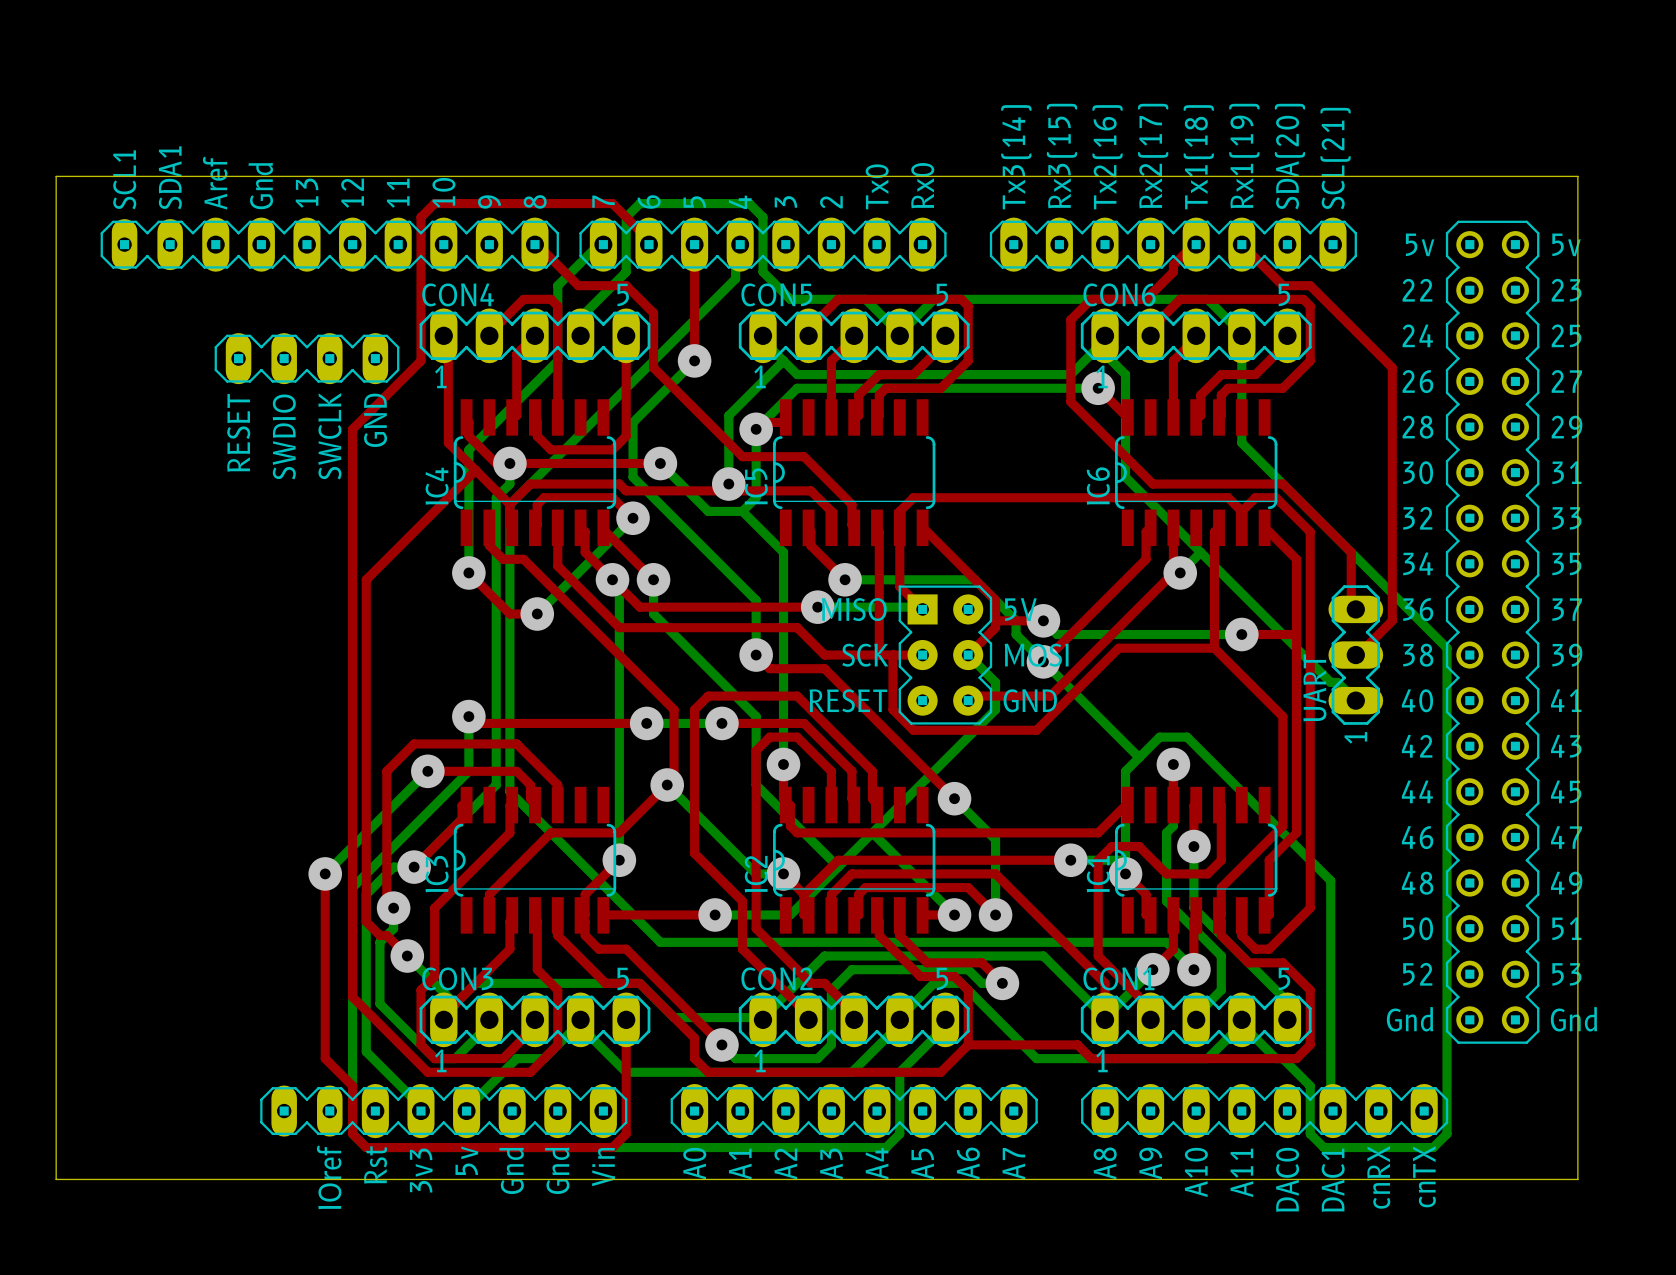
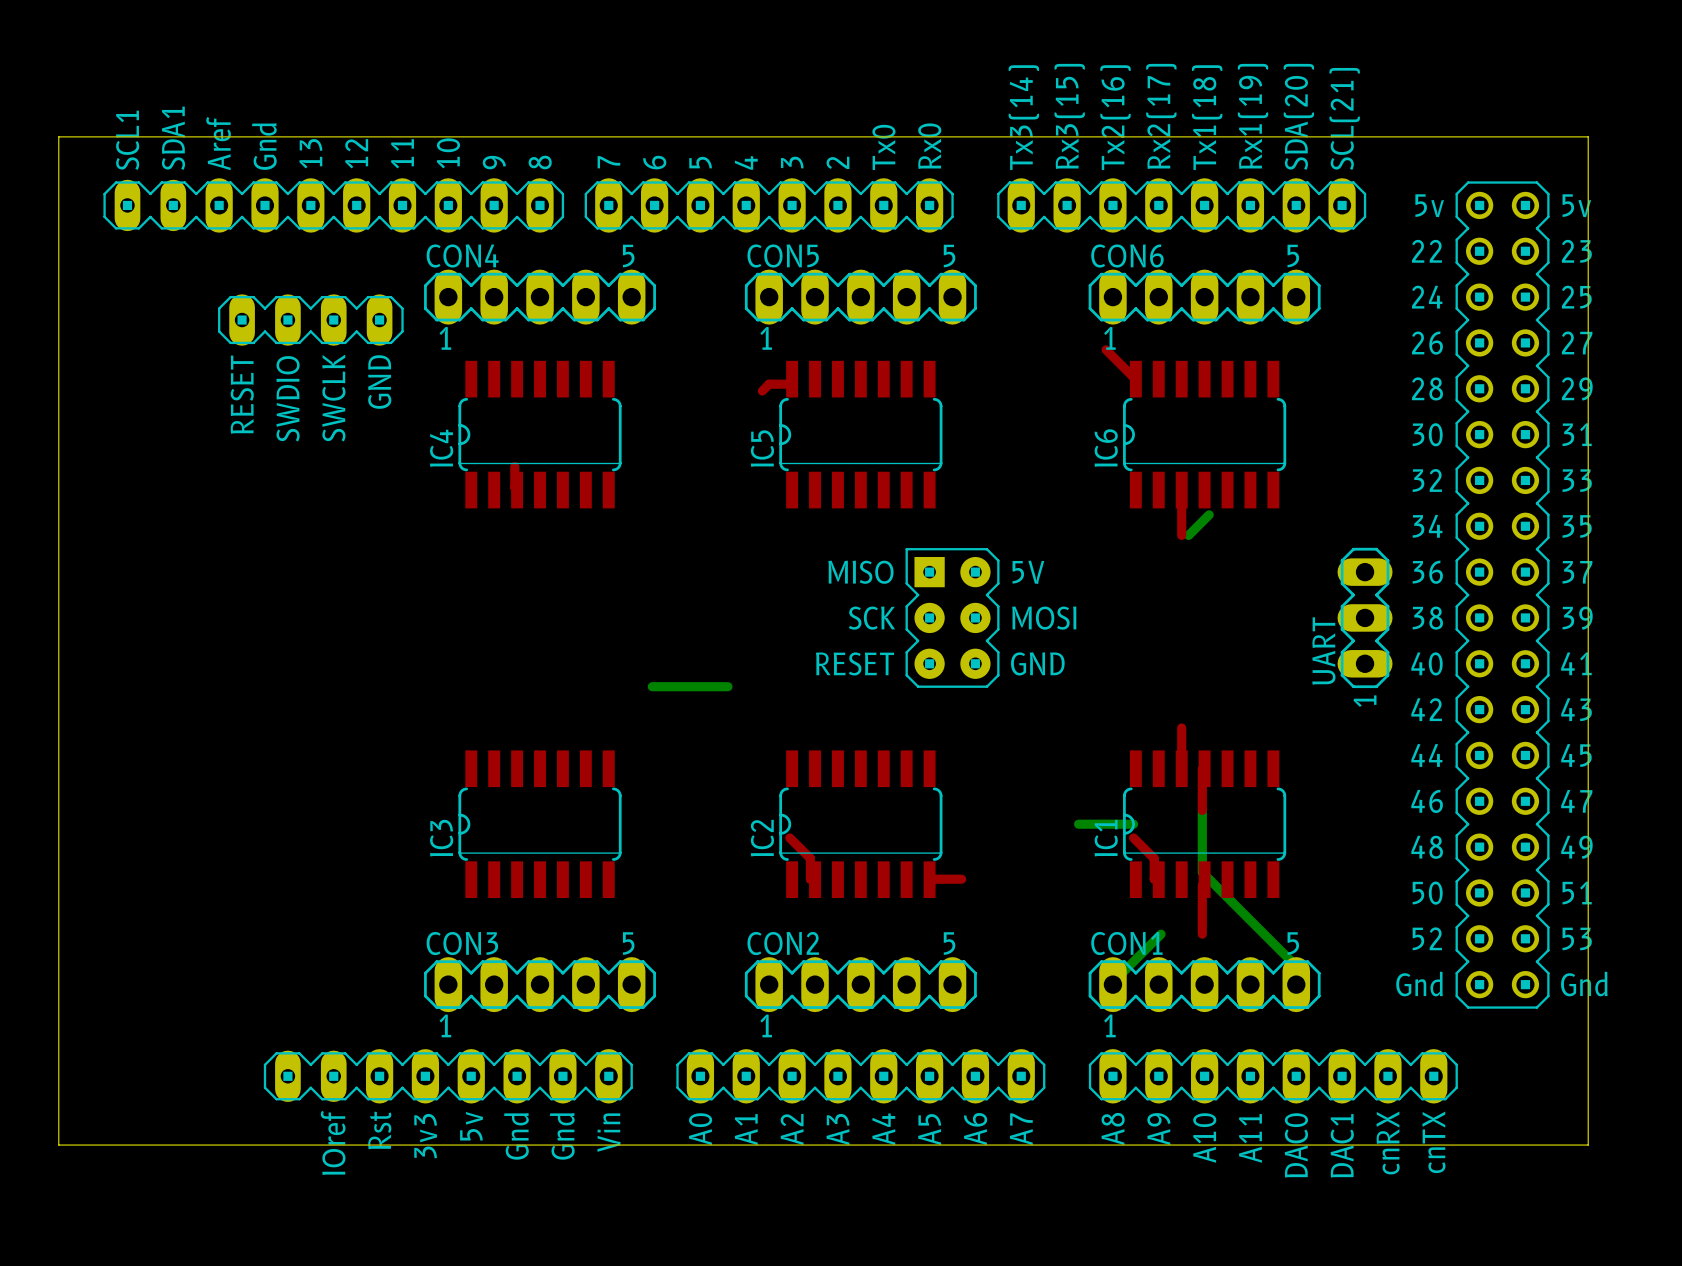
top track: (534, 244) (537, 244) (578, 285) (626, 285) (653, 313) (653, 367) (742, 456) (804, 456) (851, 504) (851, 525) (854, 527) -> none
bottom track: (603, 244) (598, 244) (557, 285) (557, 360) (468, 449) (468, 572) -> none
top track: (648, 244) (653, 244) (612, 203) (434, 203) (420, 217) (420, 360) (352, 429) (352, 997) (427, 1072) (530, 1072) (557, 1044) (557, 990) (537, 969) (537, 921) (534, 915) -> none
top track: (694, 244) (694, 360) -> none
bottom track: (740, 244) (735, 244) (735, 278) (509, 504) (509, 791) (660, 942) (1166, 942) (1193, 969) -> none
top track: (1196, 244) (1193, 244) (1173, 265) (1173, 271) (1146, 299) (1091, 299) (1070, 319) (1070, 401) (1152, 484) (1282, 484) (1351, 552) (1351, 607) (1355, 609) -> none
top track: (1241, 244) (1282, 285) (1310, 285) (1392, 367) (1392, 620) (1358, 655) (1355, 655) -> none
bottom track: (899, 333) (865, 299) (790, 299) (762, 271) (762, 217) (749, 203) (639, 203) (626, 217) (626, 271) (585, 313) (585, 333) (580, 335) -> none
bottom track: (899, 333) (934, 299) (1207, 299) (1241, 333) (1241, 442) (1447, 648) (1447, 1133) (1433, 1147) (1323, 1147) (1310, 1133) (1310, 1085) (1282, 1058) (1276, 1058) (1241, 1024) -> none
top track: (443, 335) (448, 340) (448, 442) (509, 504) (530, 484) (619, 484) (626, 490) (810, 490) (831, 511) (831, 527) -> none
top track: (489, 335) (489, 333) (523, 299) (550, 299) (557, 306) (557, 417) -> none
top track: (534, 335) (516, 354) (516, 415) (512, 417) -> none
top track: (626, 335) (626, 436) (612, 449) (550, 449) (537, 436) (537, 422) (534, 417) -> none
bottom track: (762, 335) (762, 340) (797, 374) (1070, 374) (1105, 340) (1105, 335) (1098, 347) (1125, 374) (1125, 477) (1330, 682) (1337, 682) (1355, 700) -> none
top track: (808, 335) (804, 333) (838, 299) (961, 299) (968, 306) (968, 360) (940, 388) (886, 388) (879, 395) (879, 415) (876, 417) -> none
top track: (854, 335) (831, 360) (831, 417) -> none
top track: (945, 335) (947, 340) (913, 374) (879, 374) (858, 395) (858, 415) (854, 417) -> none
top track: (1150, 335) (1146, 333) (1180, 299) (1303, 299) (1310, 306) (1310, 360) (1282, 388) (1228, 388) (1221, 395) (1221, 415) (1219, 417) -> none
top track: (1196, 335) (1173, 360) (1173, 417) -> none
top track: (1287, 335) (1289, 340) (1255, 374) (1221, 374) (1200, 395) (1200, 415) (1196, 417) -> none
bottom track: (694, 360) (633, 422) (633, 477) (756, 600) (756, 655) -> none
via: (694, 360) -> none
bottom track: (783, 360) (728, 415) (728, 484) -> none
bottom track: (1098, 388) (797, 388) (756, 429) (756, 497) (742, 511) -> none
via: (1098, 388) -> none
top track: (466, 417) (468, 422) (468, 436) (496, 463) (660, 463) -> none
via: (756, 429) -> none
bottom track: (509, 463) (509, 484) (496, 497) (496, 785) (414, 867) (393, 867) (366, 894) (366, 1051) (420, 1106) (420, 1111) -> none
via: (509, 463) -> none
bottom track: (660, 463) (708, 511) (742, 511) -> none
via: (660, 463) -> none
top track: (475, 470) (366, 579) (366, 921) (379, 935) (386, 935) (407, 956) -> none
via: (728, 484) -> none
bottom track: (742, 511) (783, 552) (783, 764) -> none
top track: (1241, 511) (1255, 497) (1276, 497) (1310, 531) (1310, 908) (1269, 949) (1255, 949) (1241, 935) (1241, 915) -> none
top track: (1241, 511) (1228, 497) (913, 497) (899, 511) (899, 586) (922, 609) -> none
top track: (633, 518) (612, 497) (544, 497) (537, 504) (537, 525) (534, 527) -> none
bottom track: (633, 518) (537, 614) -> none
via: (633, 518) -> none
top track: (489, 527) (489, 545) (503, 559) (523, 559) (674, 709) (674, 778) (619, 832) (550, 832) (489, 894) (489, 915) -> none
top track: (557, 527) (557, 566) (619, 627) (797, 627) (824, 655) (922, 655) -> none
top track: (580, 527) (585, 531) (585, 552) (639, 607) (817, 607) -> none
top track: (603, 527) (653, 579) -> none
top track: (808, 527) (810, 531) (810, 545) (845, 579) -> none
top track: (876, 527) (879, 531) (879, 655) -> none
top track: (922, 527) (995, 600) (995, 627) (968, 655) -> none
top track: (1150, 527) (1146, 531) (1146, 559) (1043, 661) -> none
top track: (1219, 527) (1214, 531) (1214, 648) -> none
top track: (1264, 527) (1296, 559) (1296, 832) (1269, 860) (1269, 914) (1264, 915) -> none
top track: (468, 572) (509, 614) (537, 614) -> none
via: (468, 572) -> none
top track: (1180, 572) (1173, 572) (1050, 696) (968, 696) (968, 700) -> none
via: (1180, 572) -> none
bottom track: (612, 579) (619, 586) (619, 860) -> none
via: (612, 579) -> none
bottom track: (653, 579) (653, 614) (756, 716) (756, 785) (838, 867) -> none
via: (653, 579) -> none
bottom track: (845, 579) (975, 579) (1016, 620) (1016, 634) (1139, 757) -> none
via: (845, 579) -> none
bottom track: (817, 607) (920, 607) (922, 609) -> none
via: (817, 607) -> none
via: (537, 614) -> none
top track: (995, 620) (1043, 620) -> none
bottom track: (1043, 620) (1057, 634) (1241, 634) -> none
via: (1043, 620) -> none
top track: (1241, 634) (1296, 634) -> none
via: (1241, 634) -> none
top track: (1214, 648) (1282, 716) (1282, 826) (1221, 887) (1221, 914) (1219, 915) (1221, 921) (1221, 935) (1248, 962) (1282, 962) (1310, 990) (1310, 1044) (1296, 1058) (1091, 1058) (1077, 1044) (968, 1044) -> none
top track: (1214, 648) (1118, 648) (1036, 730) (913, 730) (892, 709) (892, 655) -> none
top track: (756, 655) (769, 668) (824, 668) (954, 798) -> none
via: (756, 655) -> none
bottom track: (968, 655) (995, 682) (995, 709) (790, 914) (715, 914) -> none
via: (1043, 661) -> none
top track: (468, 716) (475, 723) (646, 723) -> none
bottom track: (468, 716) (468, 771) (352, 887) (352, 1133) (366, 1147) (886, 1147) (899, 1133) (899, 1072) (947, 1024) (945, 1019) -> none
via: (468, 716) -> none
via: (646, 723) -> none
top track: (721, 723) (804, 723) (851, 771) (851, 798) (854, 805) -> none
via: (721, 723) -> none
top track: (783, 764) (783, 798) (785, 805) (790, 805) (790, 826) (797, 832) (1098, 832) (1127, 805) -> none
via: (783, 764) -> none
bottom track: (1173, 764) (1173, 826) (1166, 832) (1166, 901) (1221, 956) (1221, 990) (1193, 1017) (1196, 1019) -> none
via: (1173, 764) -> none
top track: (427, 771) (516, 771) (530, 785) (530, 798) (534, 805) -> none
bottom track: (427, 771) (325, 873) -> none
via: (427, 771) -> none
bottom track: (667, 785) (756, 873) (783, 873) -> none
via: (667, 785) -> none
bottom track: (954, 798) (995, 839) (995, 914) -> none
via: (954, 798) -> none
top track: (466, 805) (462, 805) (462, 819) (414, 867) -> none
top track: (512, 805) (509, 805) (509, 832) (434, 908) (434, 976) (420, 990) (420, 1044) (434, 1058) (503, 1058) (537, 1024) (534, 1019) -> none
top track: (557, 805) (557, 785) (516, 743) (414, 743) (386, 771) (386, 901) (393, 908) -> none
top track: (831, 805) (831, 771) (797, 737) (769, 737) (756, 750) (756, 928) (810, 983) (824, 983) (858, 1017) (854, 1019) -> none
top track: (876, 805) (872, 798) (872, 771) (797, 696) (708, 696) (694, 709) (694, 853) (742, 901) (742, 949) (810, 1017) (808, 1019) -> none
top track: (1219, 805) (1221, 805) (1221, 860) (1207, 873) (1166, 873) (1139, 846) (1111, 846) (1098, 860) (1098, 956) (1146, 1003) (1146, 1017) (1150, 1019) -> none
bottom track: (872, 832) (954, 914) -> none
via: (1193, 846) -> none
top track: (619, 860) (585, 894) (585, 914) (580, 915) (585, 921) (585, 935) (598, 949) (626, 949) (721, 1044) -> none
via: (619, 860) -> none
top track: (1070, 860) (838, 860) (804, 894) -> none
via: (1070, 860) -> none
via: (414, 867) -> none
top track: (325, 873) (325, 1058) (352, 1085) (352, 1133) (366, 1147) (612, 1147) (626, 1133) (626, 1019) -> none
via: (325, 873) -> none
via: (783, 873) -> none
bottom track: (1125, 873) (1125, 771) (1159, 737) (1187, 737) (1330, 880) (1330, 1106) (1333, 1111) -> none
via: (1125, 873) -> none
bottom track: (393, 908) (393, 928) (379, 942) (379, 1003) (434, 1058) (455, 1058) (489, 1024) (489, 1019) -> none
via: (393, 908) -> none
top track: (715, 914) (603, 915) -> none
via: (715, 914) -> none
via: (954, 914) -> none
top track: (995, 914) (968, 887) (865, 887) (858, 894) (858, 914) (854, 915) -> none
via: (995, 914) -> none
top track: (512, 915) (509, 921) (509, 949) (441, 1017) (443, 1019) -> none
top track: (557, 915) (557, 935) (605, 983) (639, 983) (694, 1038) (694, 1058) (708, 1072) (940, 1072) (968, 1044) -> none
top track: (831, 915) (831, 894) (851, 873) (995, 873) (1105, 983) (1105, 1019) -> none
top track: (876, 915) (879, 921) (879, 935) (920, 976) (954, 976) (968, 990) (968, 1044) -> none
top track: (899, 915) (899, 935) (927, 962) (981, 962) (1002, 983) -> none
top track: (1173, 915) (1173, 949) (1152, 969) -> none
bottom track: (407, 956) (455, 1003) (443, 1019) (441, 1017) (475, 983) (639, 983) (674, 1017) (762, 1017) -> none
via: (407, 956) -> none
via: (1152, 969) -> none
via: (1193, 969) -> none
bottom track: (1002, 983) (981, 983) (968, 969) (851, 969) (831, 990) (831, 1044) (817, 1058) (735, 1058) (721, 1044) -> none
via: (1002, 983) -> none
bottom track: (762, 1017) (824, 956) (1043, 956) (1105, 1017) (1105, 1019) -> none
bottom track: (578, 1024) (544, 1058) (516, 1058) (468, 1106) (466, 1111) -> none
bottom track: (578, 1024) (626, 1072) (851, 1072) (899, 1024) (899, 1017) (934, 983) (961, 983) (1036, 1058) (1207, 1058) (1241, 1024) -> none
via: (721, 1044) -> none

